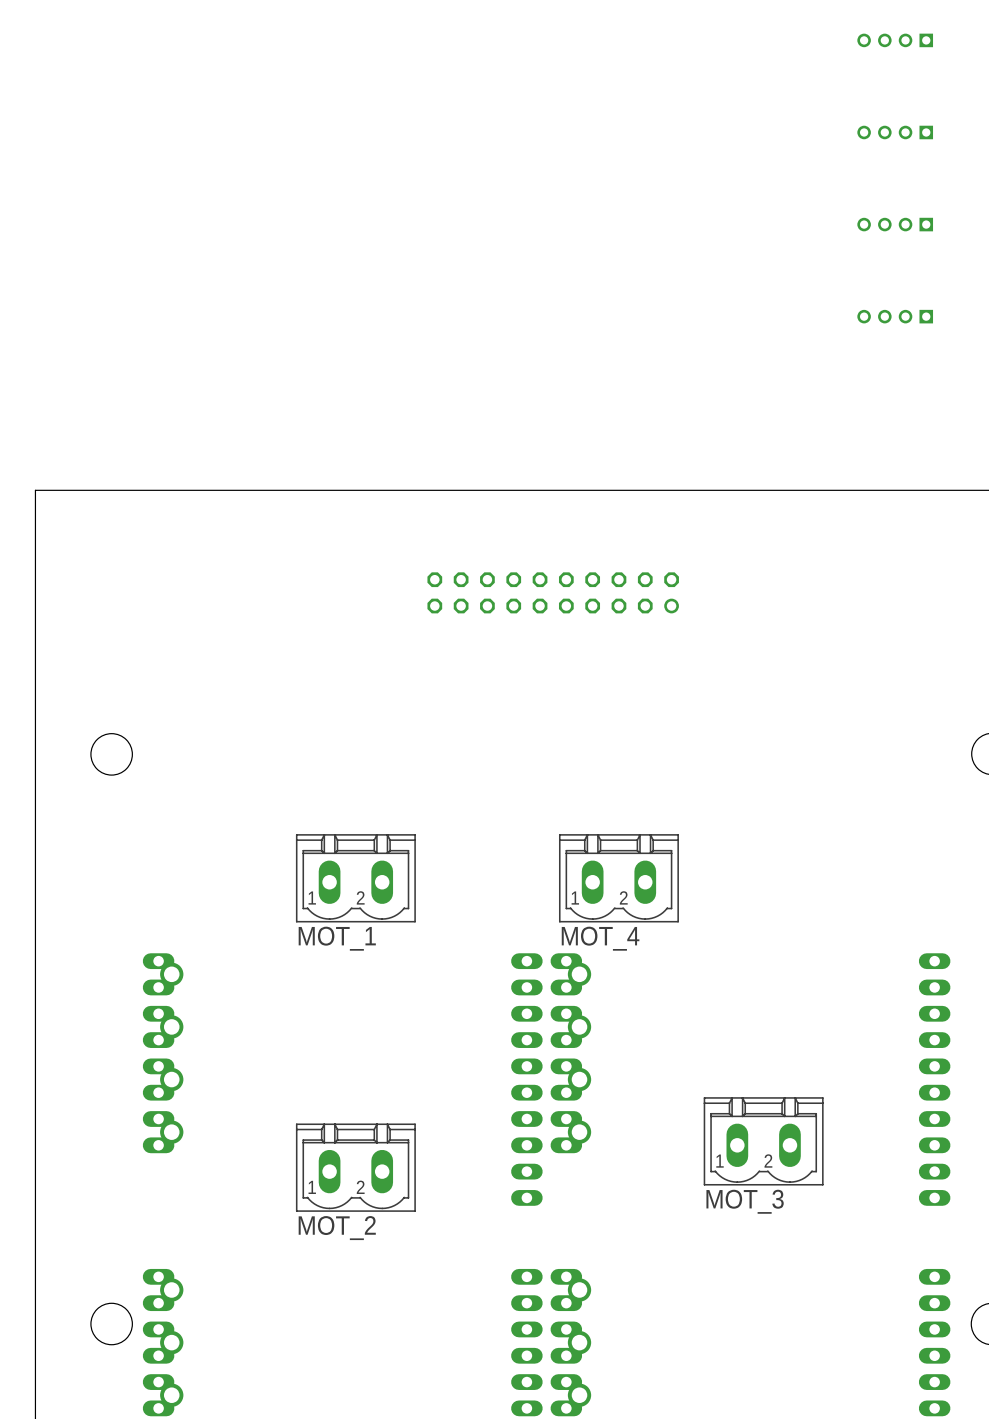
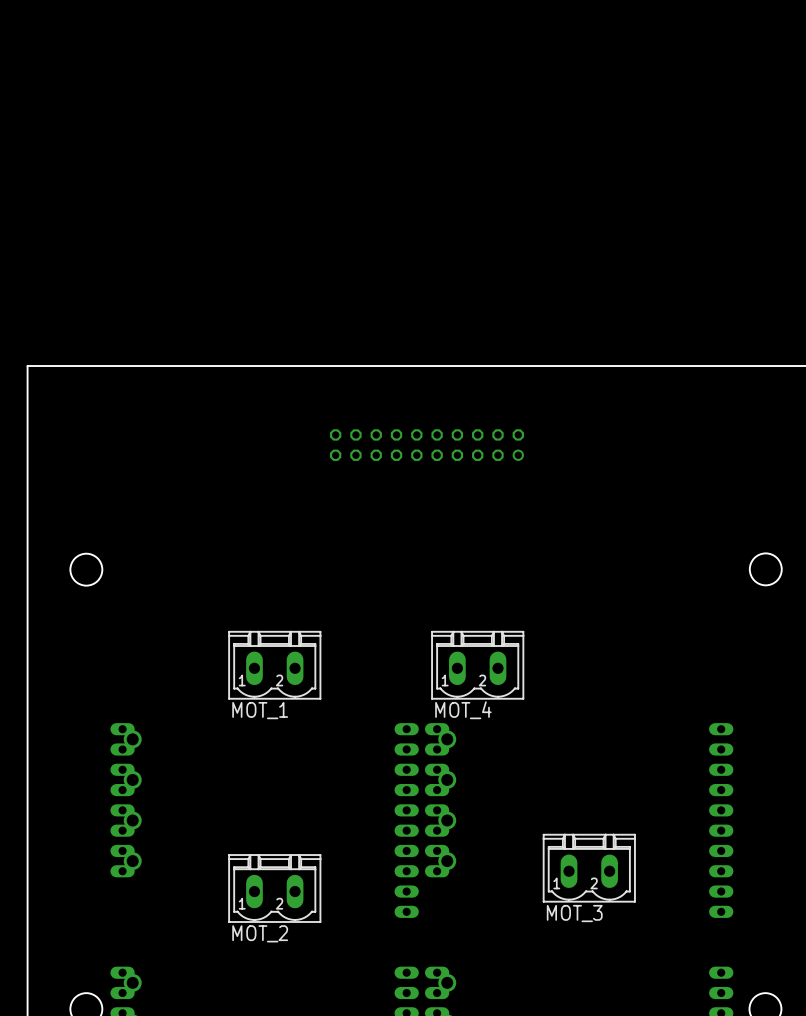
part: (895, 40) -> none
part: (895, 132) -> none
part: (895, 224) -> none
part: (895, 316) -> none

